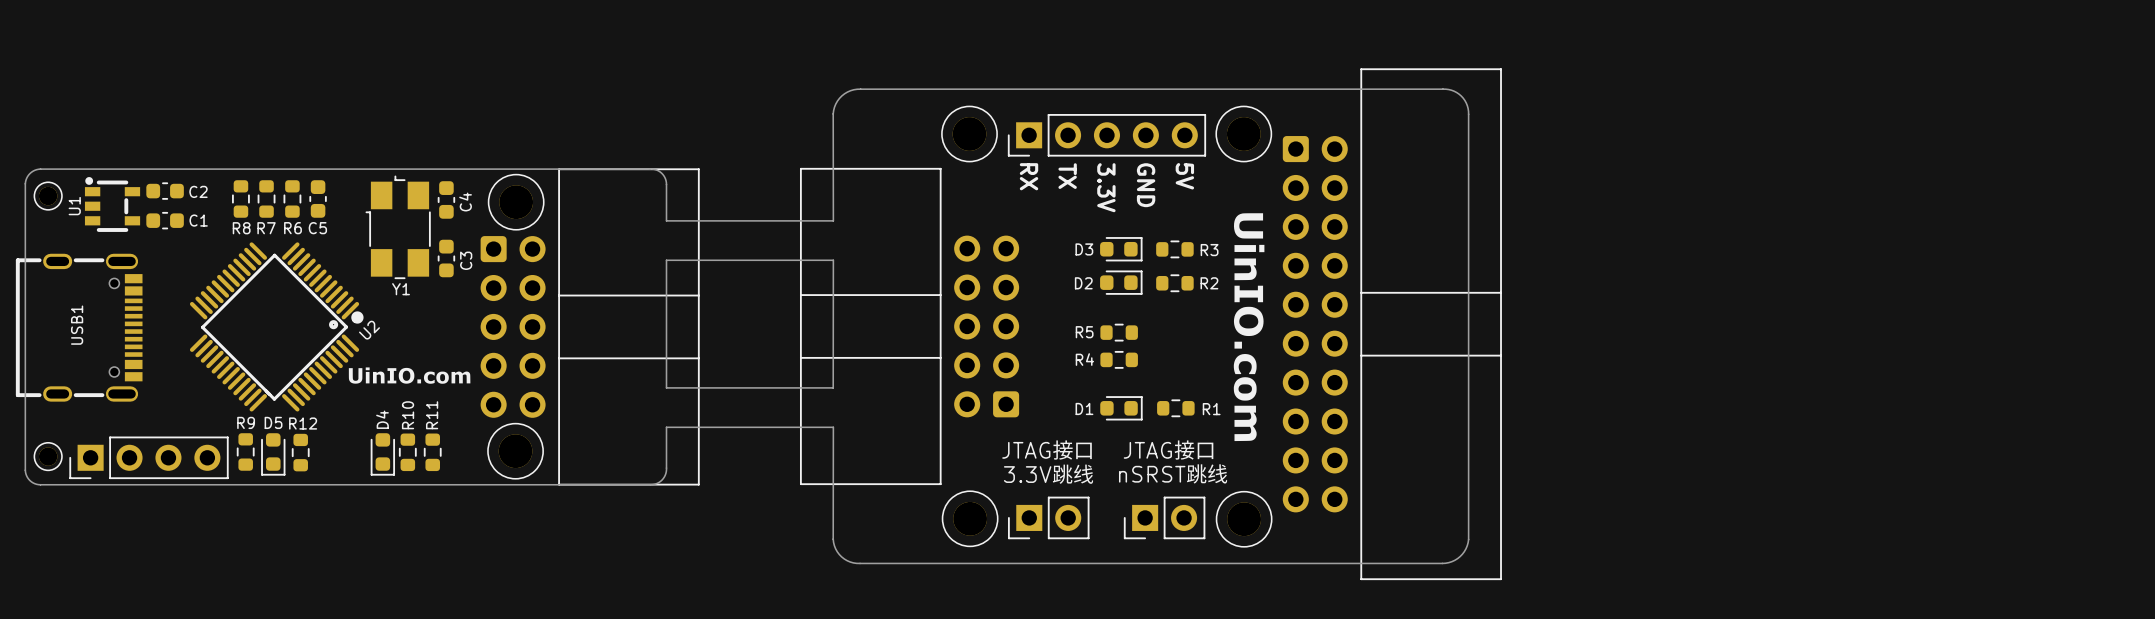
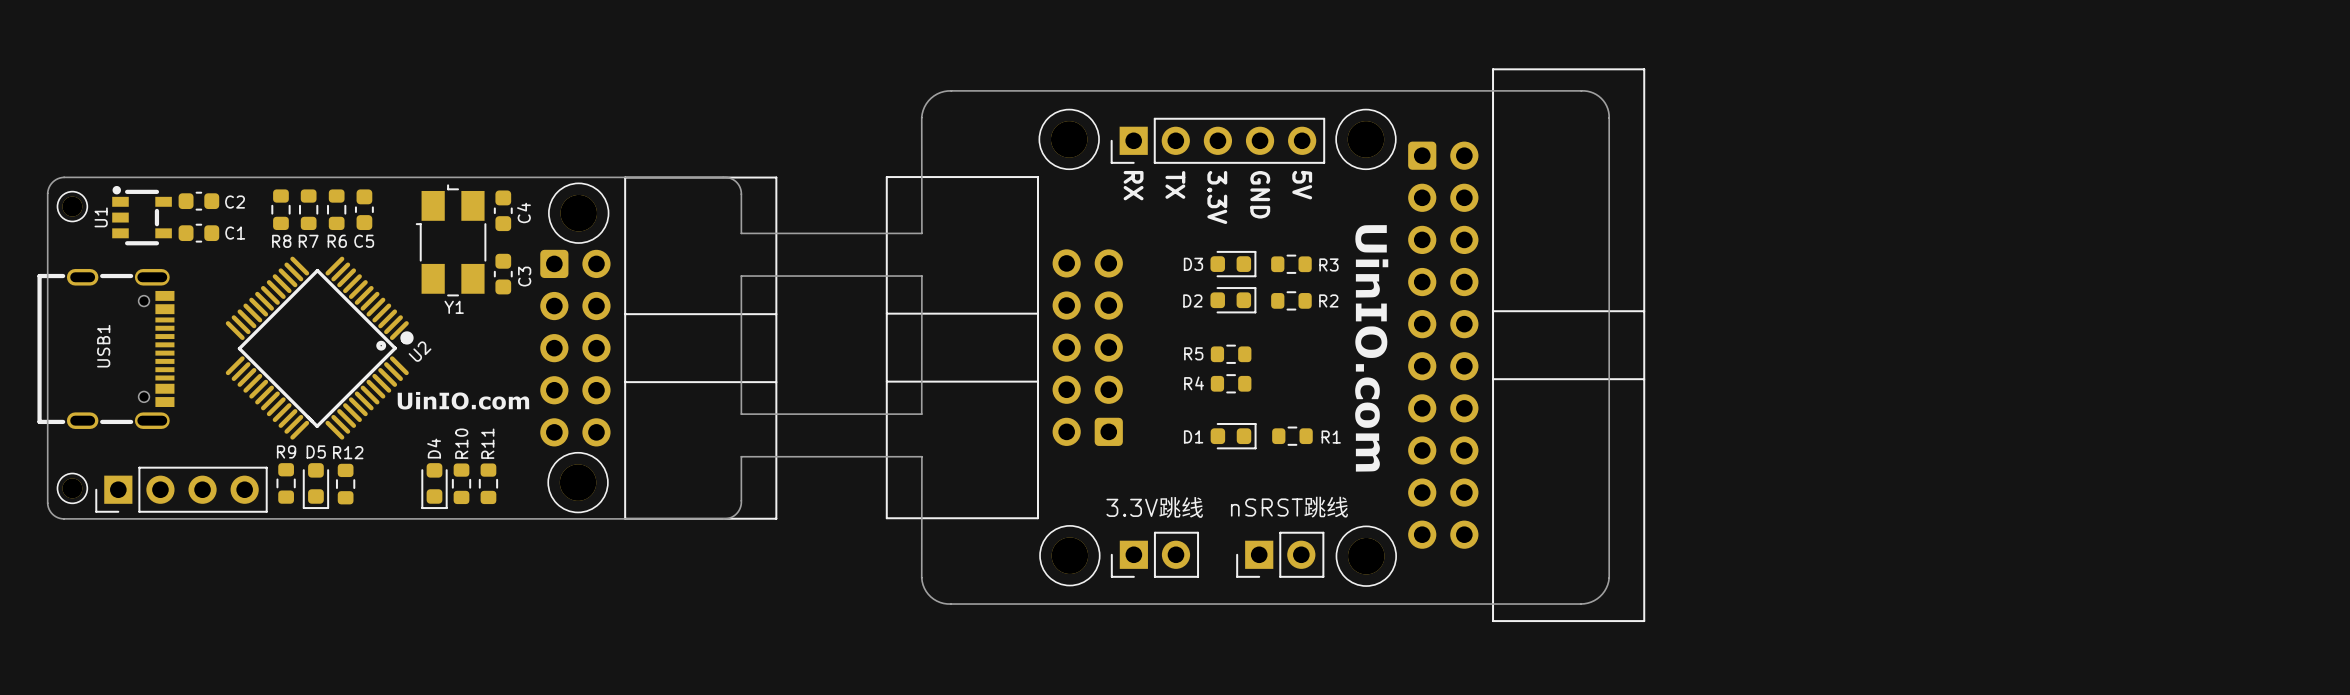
text: JTAG接口 (1047, 450) -> none
text: JTAG接口 (1168, 450) -> none

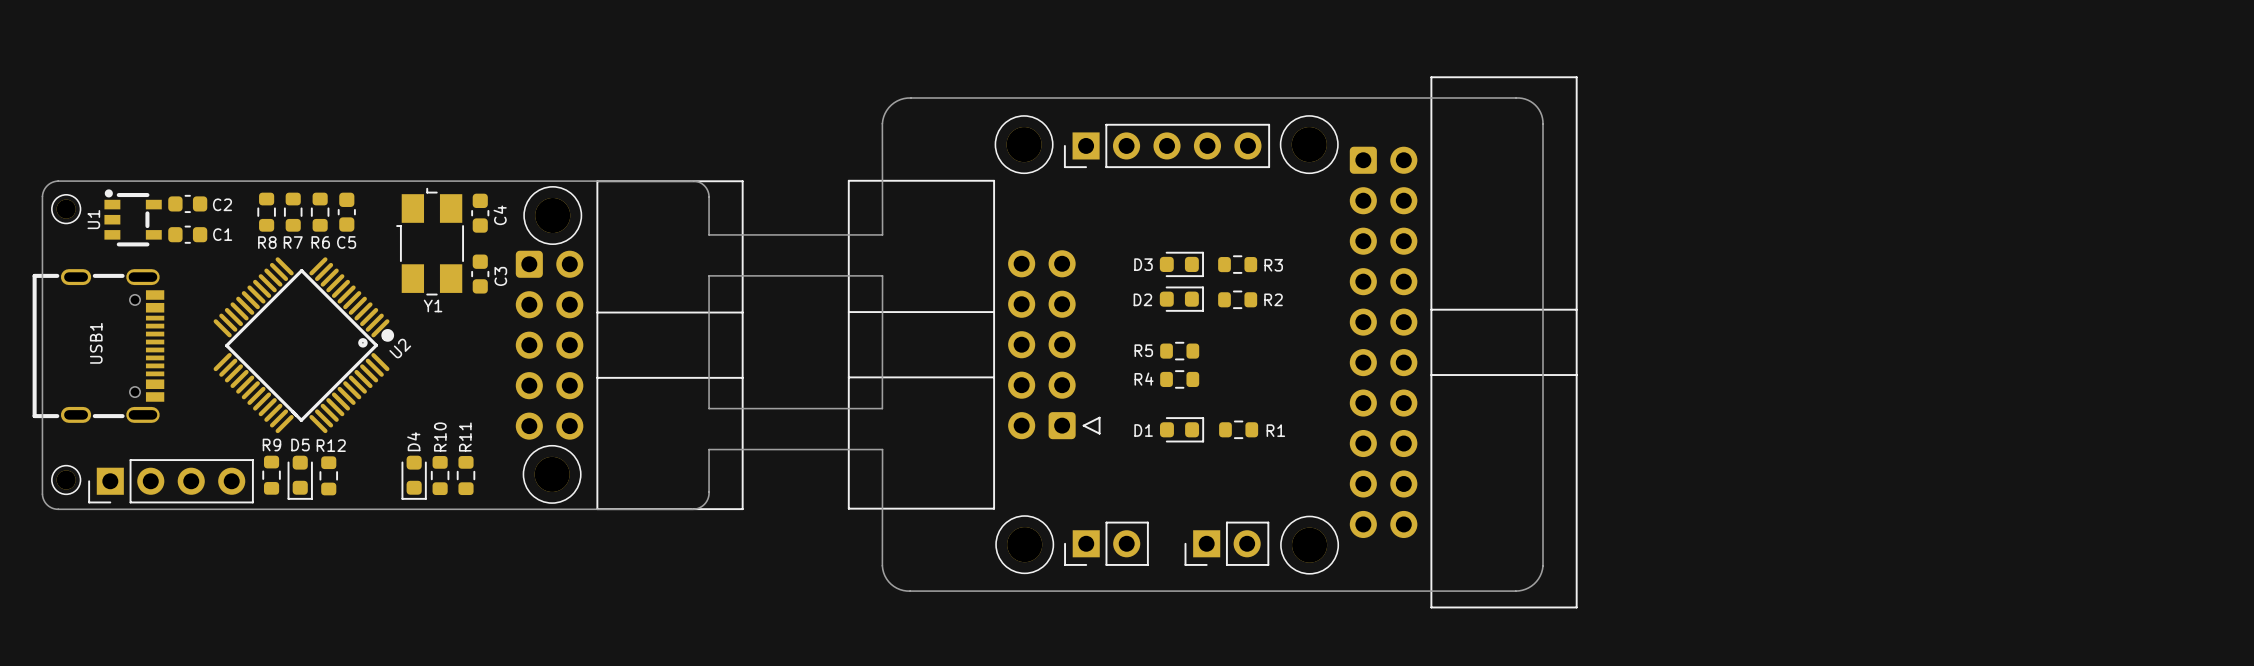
part footprint: [885, 176, 1123, 520] -> [847, 179, 1101, 510]
text: TX (1175, 184) -> none
text: RX (1133, 185) -> none
text: 5V (1302, 185) -> none
text: GND (1260, 194) -> none
text: 3.3V (1217, 197) -> none
drawing: [1355, 225, 1389, 472] -> none
drawing: [397, 391, 530, 410] -> none
text: 3.3V跳线 (1155, 507) -> none
text: nSRST跳线 (1289, 507) -> none

